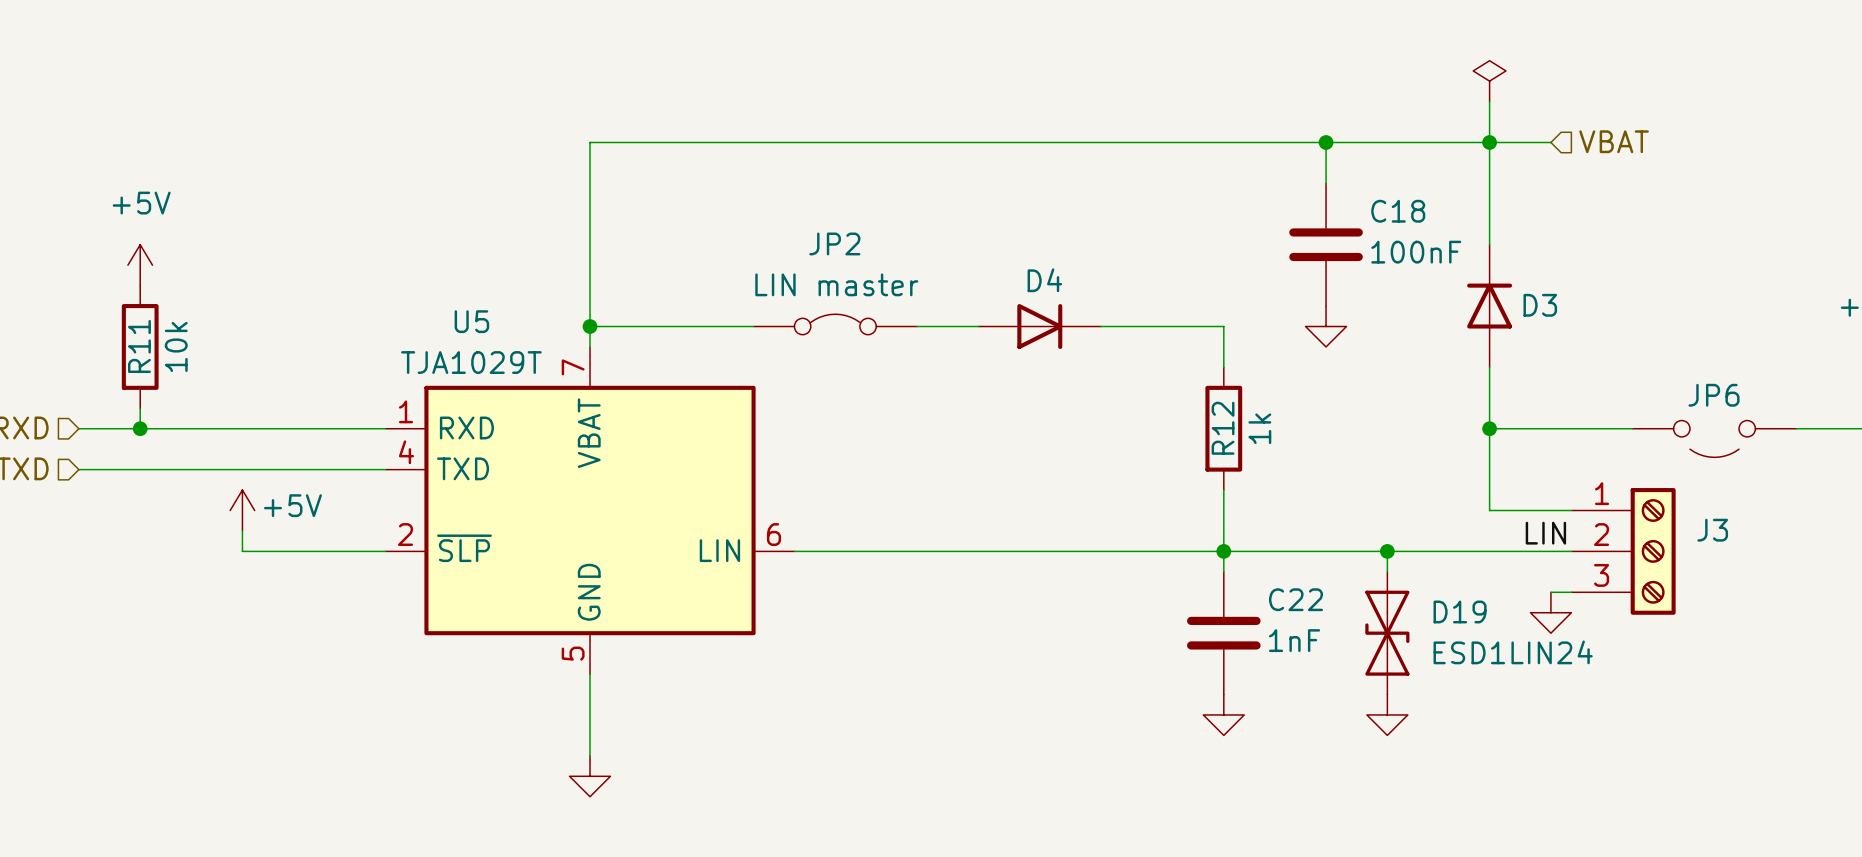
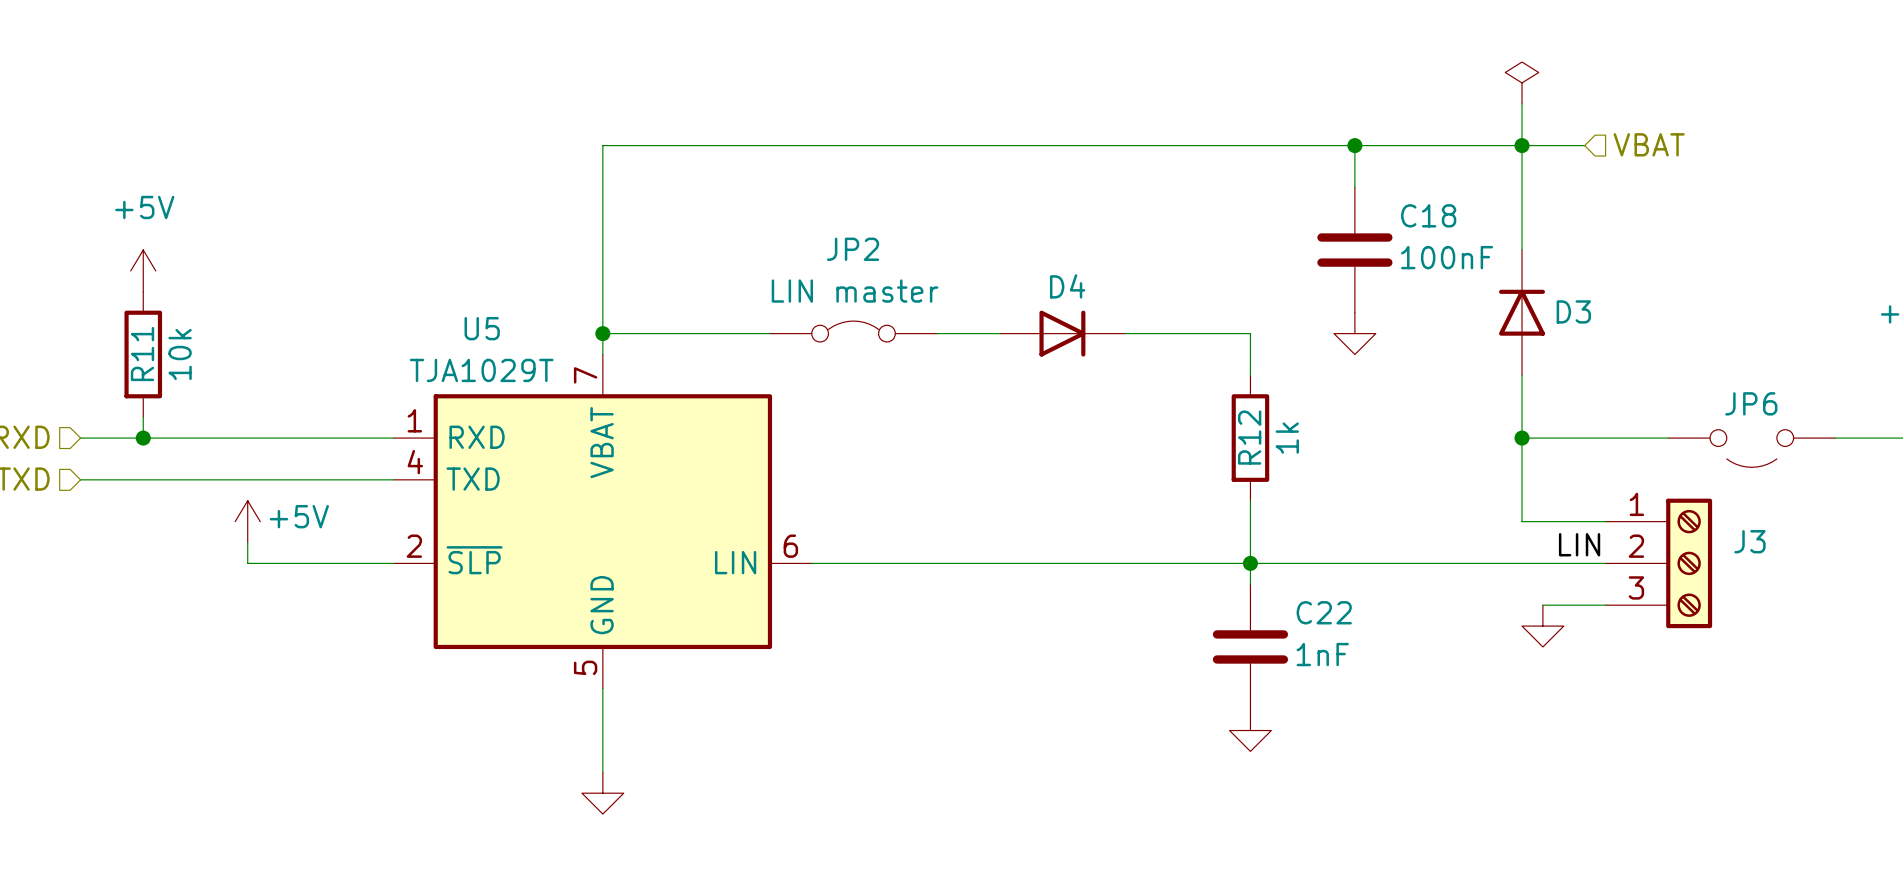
wire: (1387, 551) (1387, 571) -> none
junction: (1387, 551) -> none
wire: none -> (1542, 605) (1584, 605)
power symbol position: (1550, 612) -> (1542, 626)
D19: ESD1LIN24 (1387, 633) -> none
power symbol: (1387, 714) -> none

